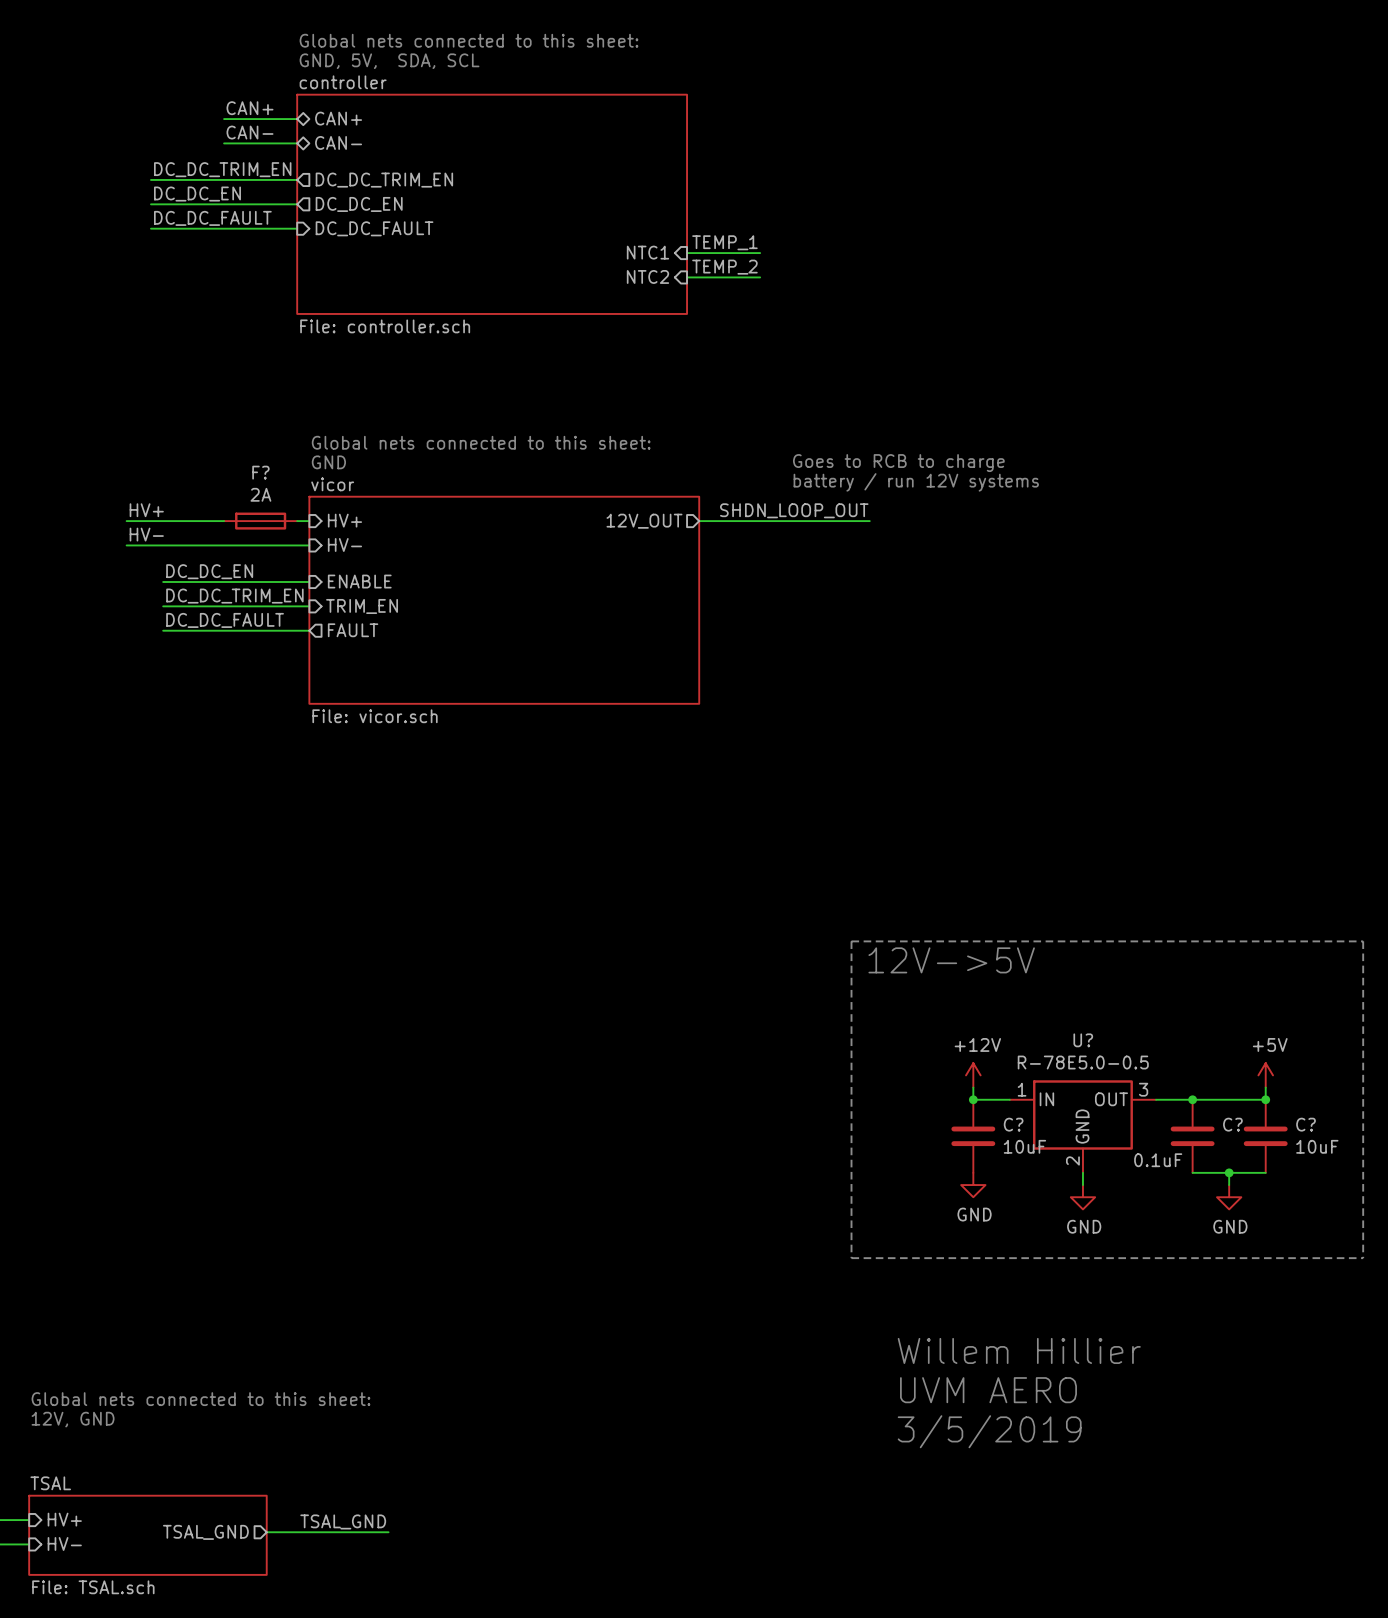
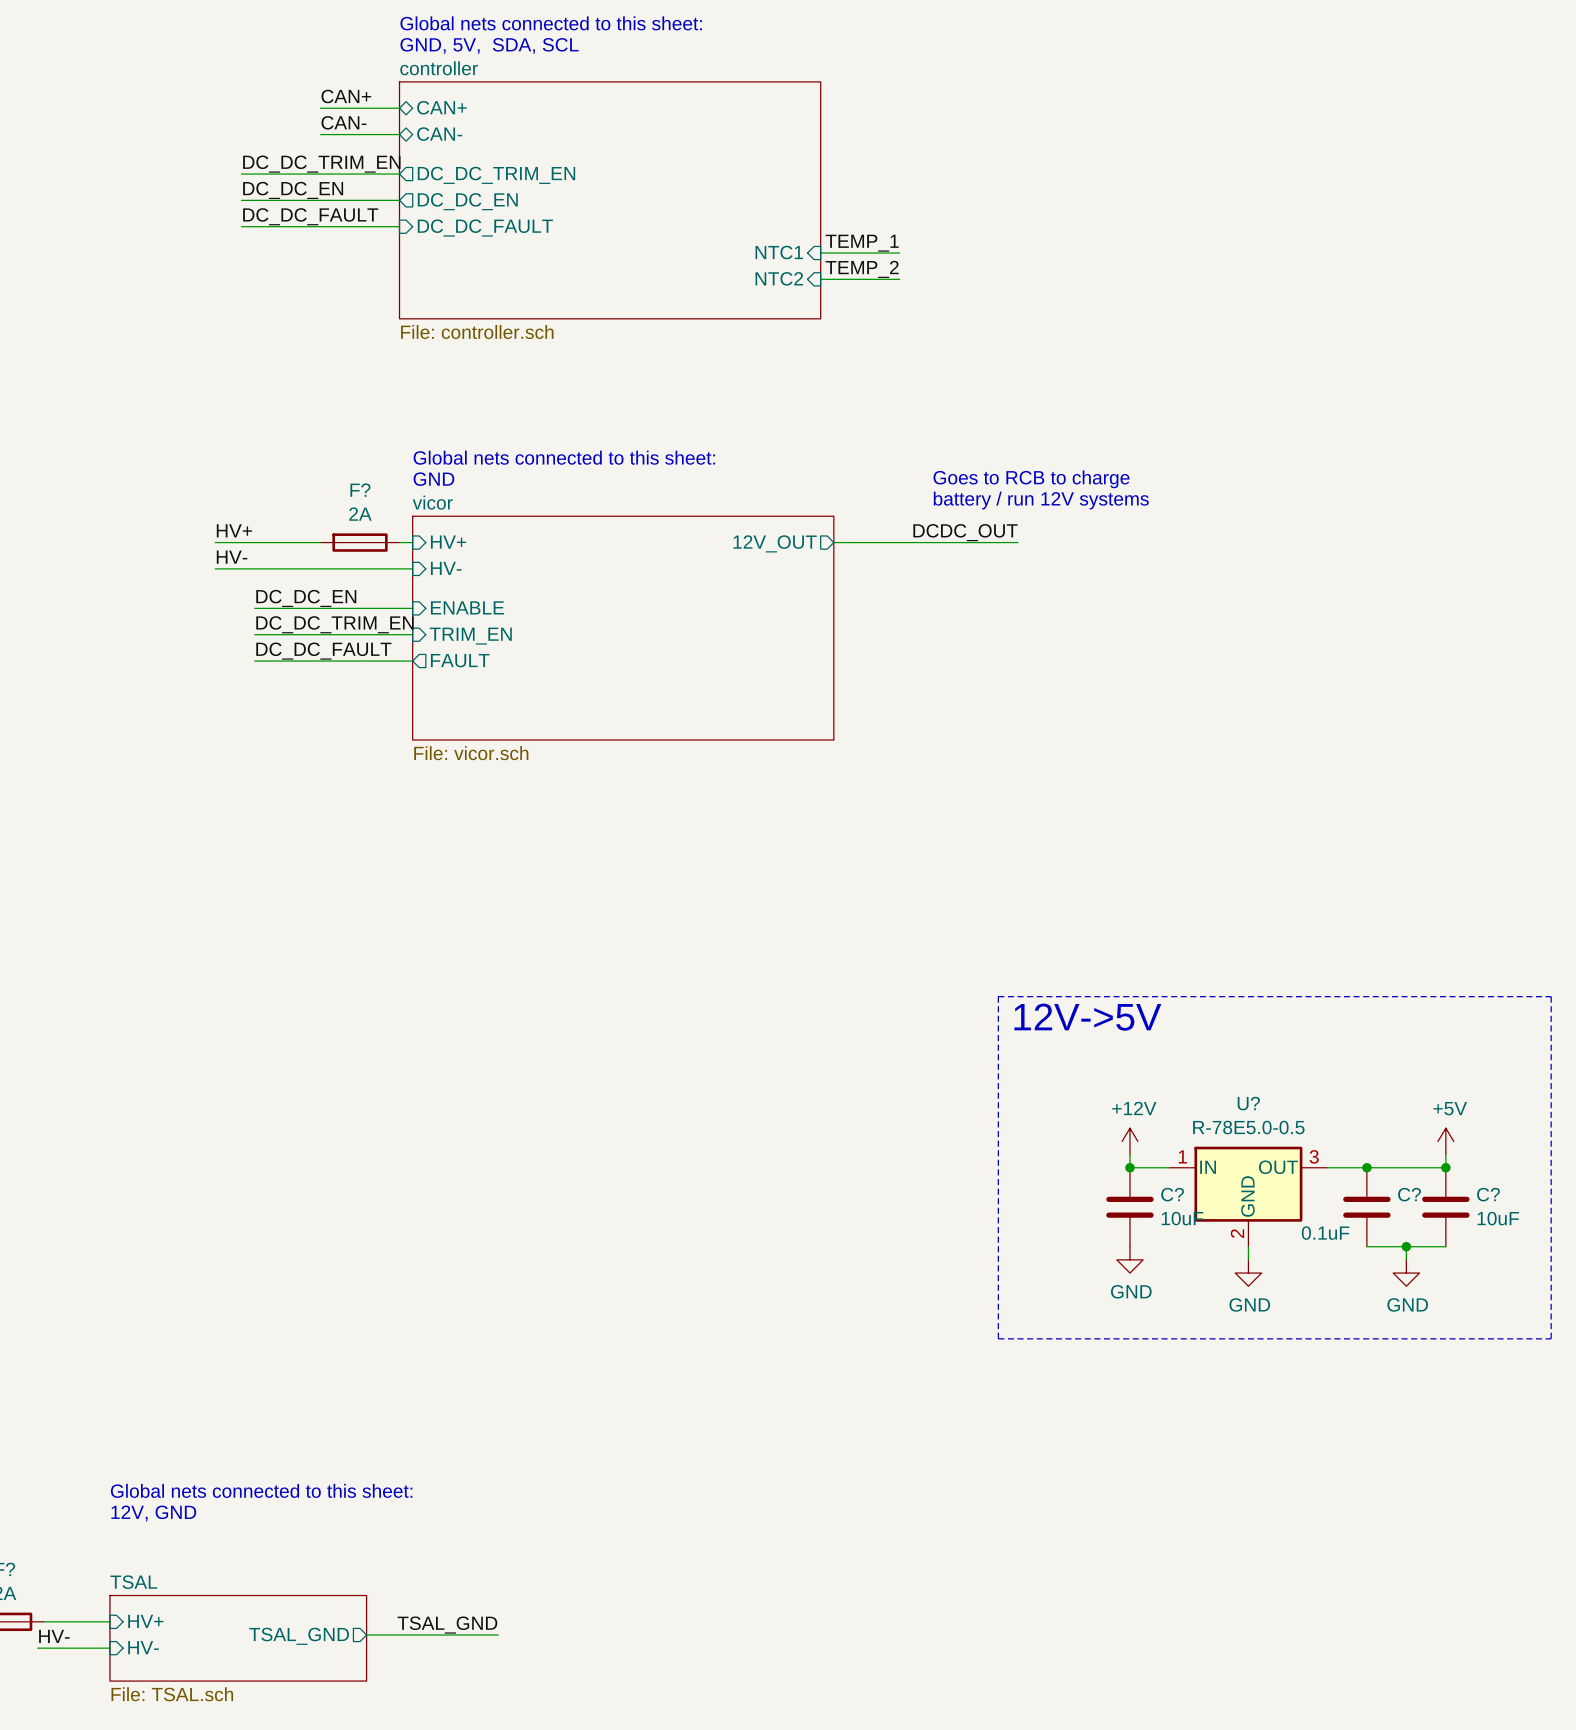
label: SHDN_LOOP_OUT (794, 510) -> DCDC_OUT (965, 532)
text: Willem Hillier (1019, 1350) -> none
text: UVM AERO (988, 1390) -> none
text: 3/5/2019 (989, 1431) -> none

